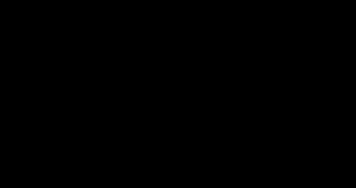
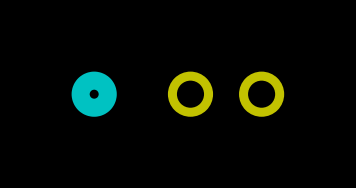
part: none -> (177, 94)

